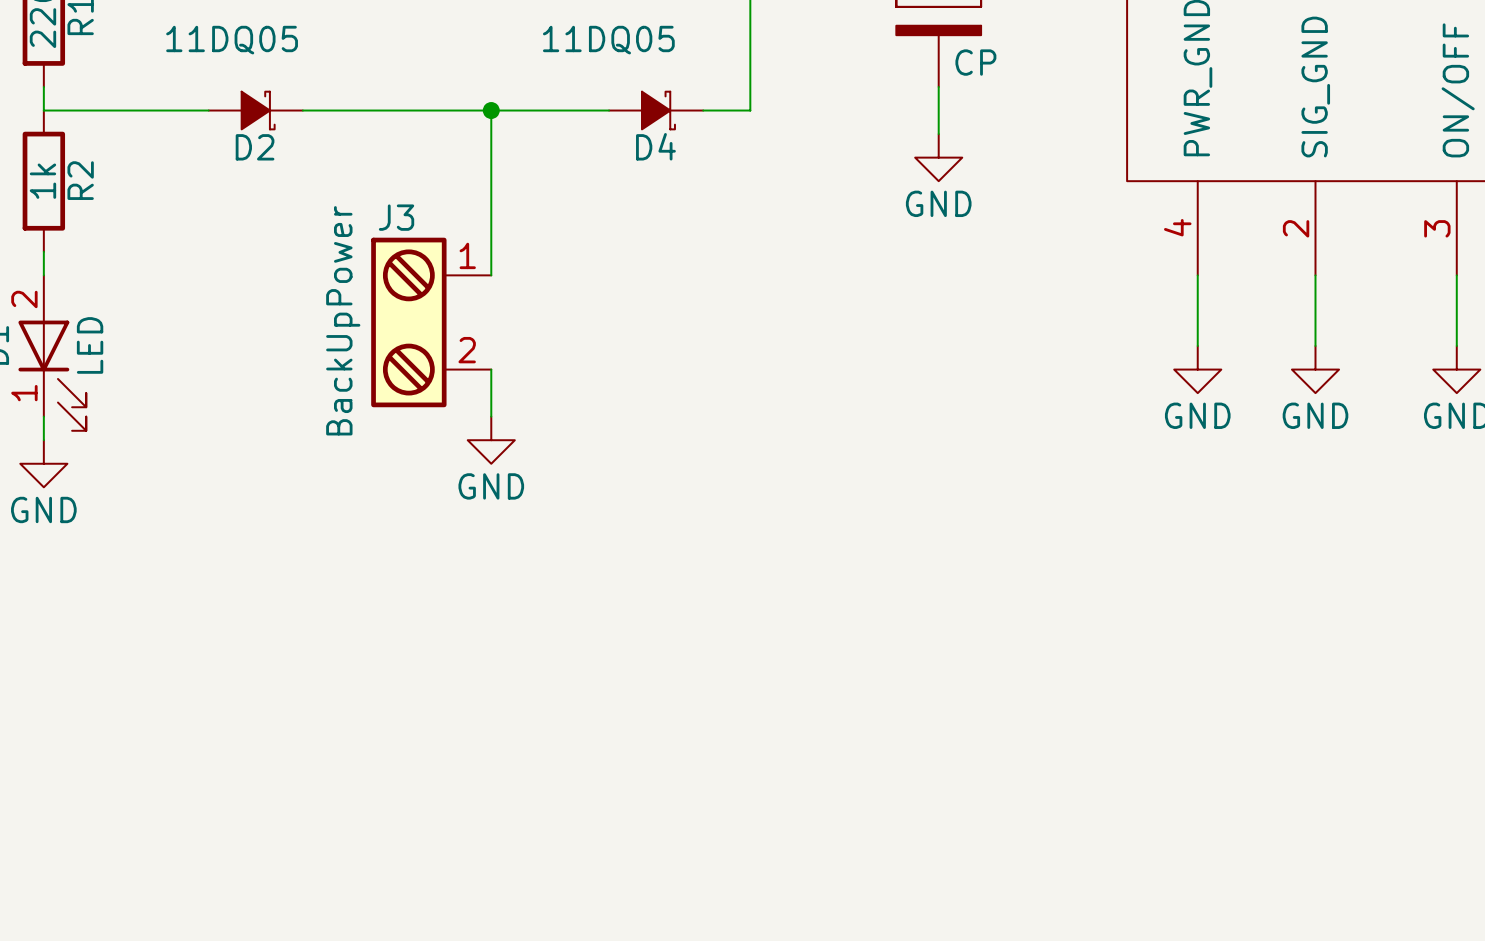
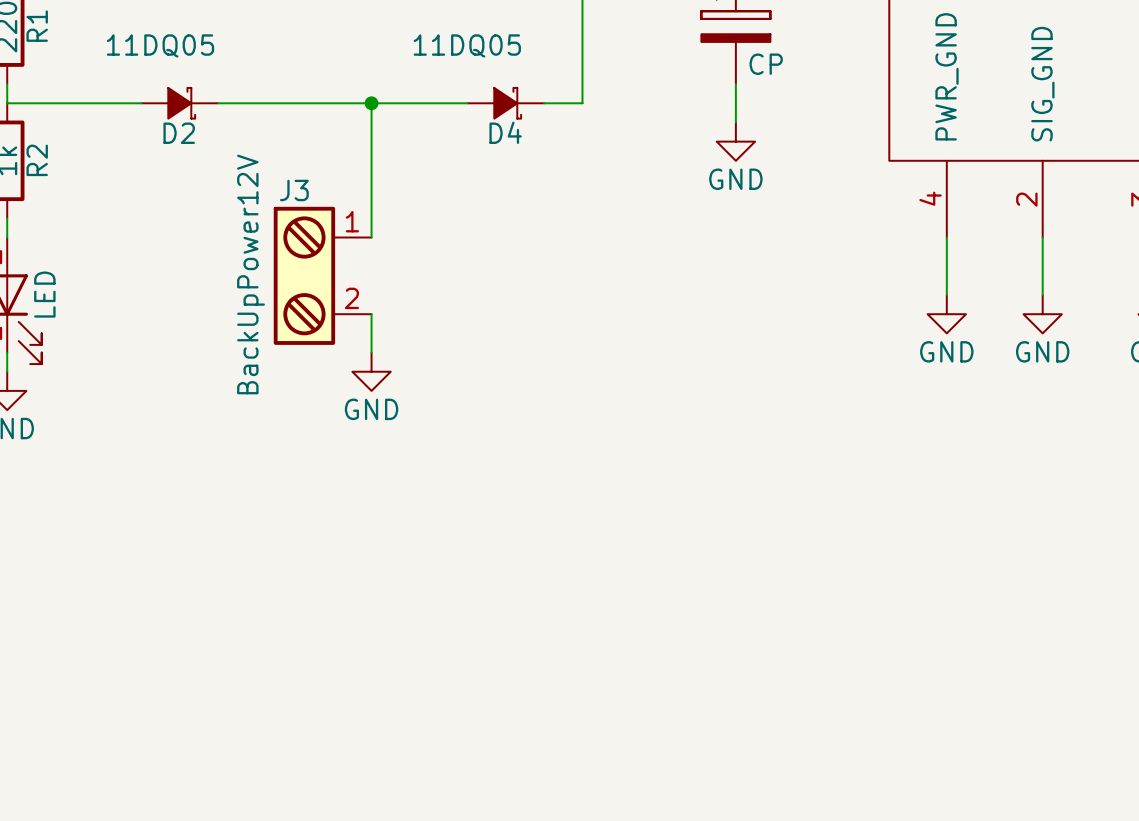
J3 value: BackUpPower (343, 320) -> BackUpPower12V (251, 274)

